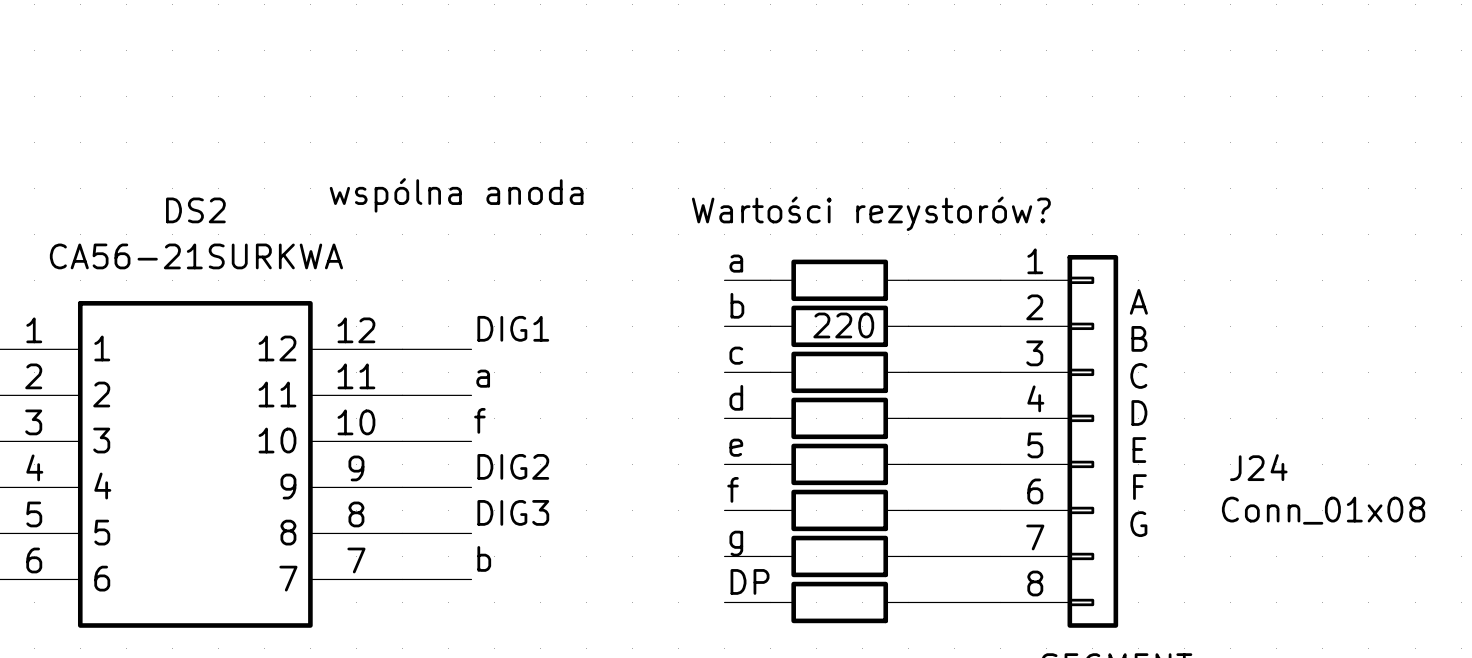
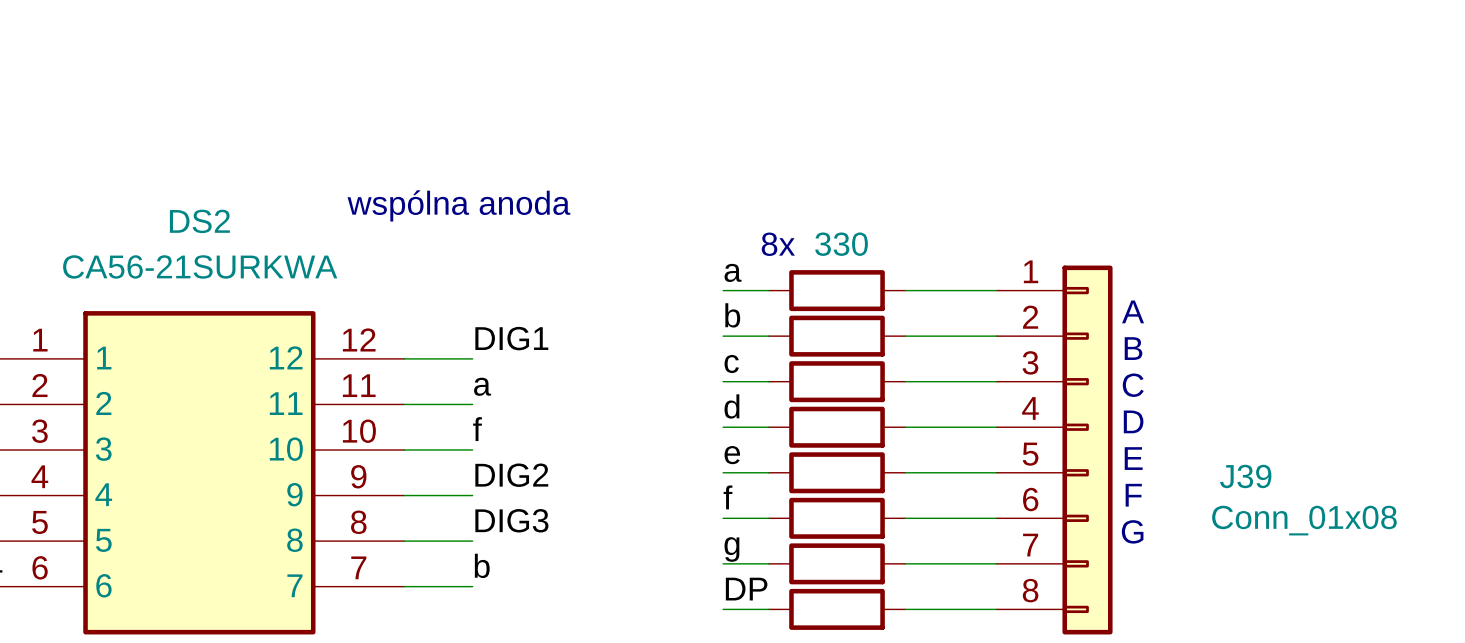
text: Wartości rezystorów? (871, 213) -> none
text: none -> 8x (778, 244)
part value: none -> 330 (841, 244)
part value: 220 (843, 325) -> none
J24 name: J24 (1258, 467) -> J39 (1245, 476)

